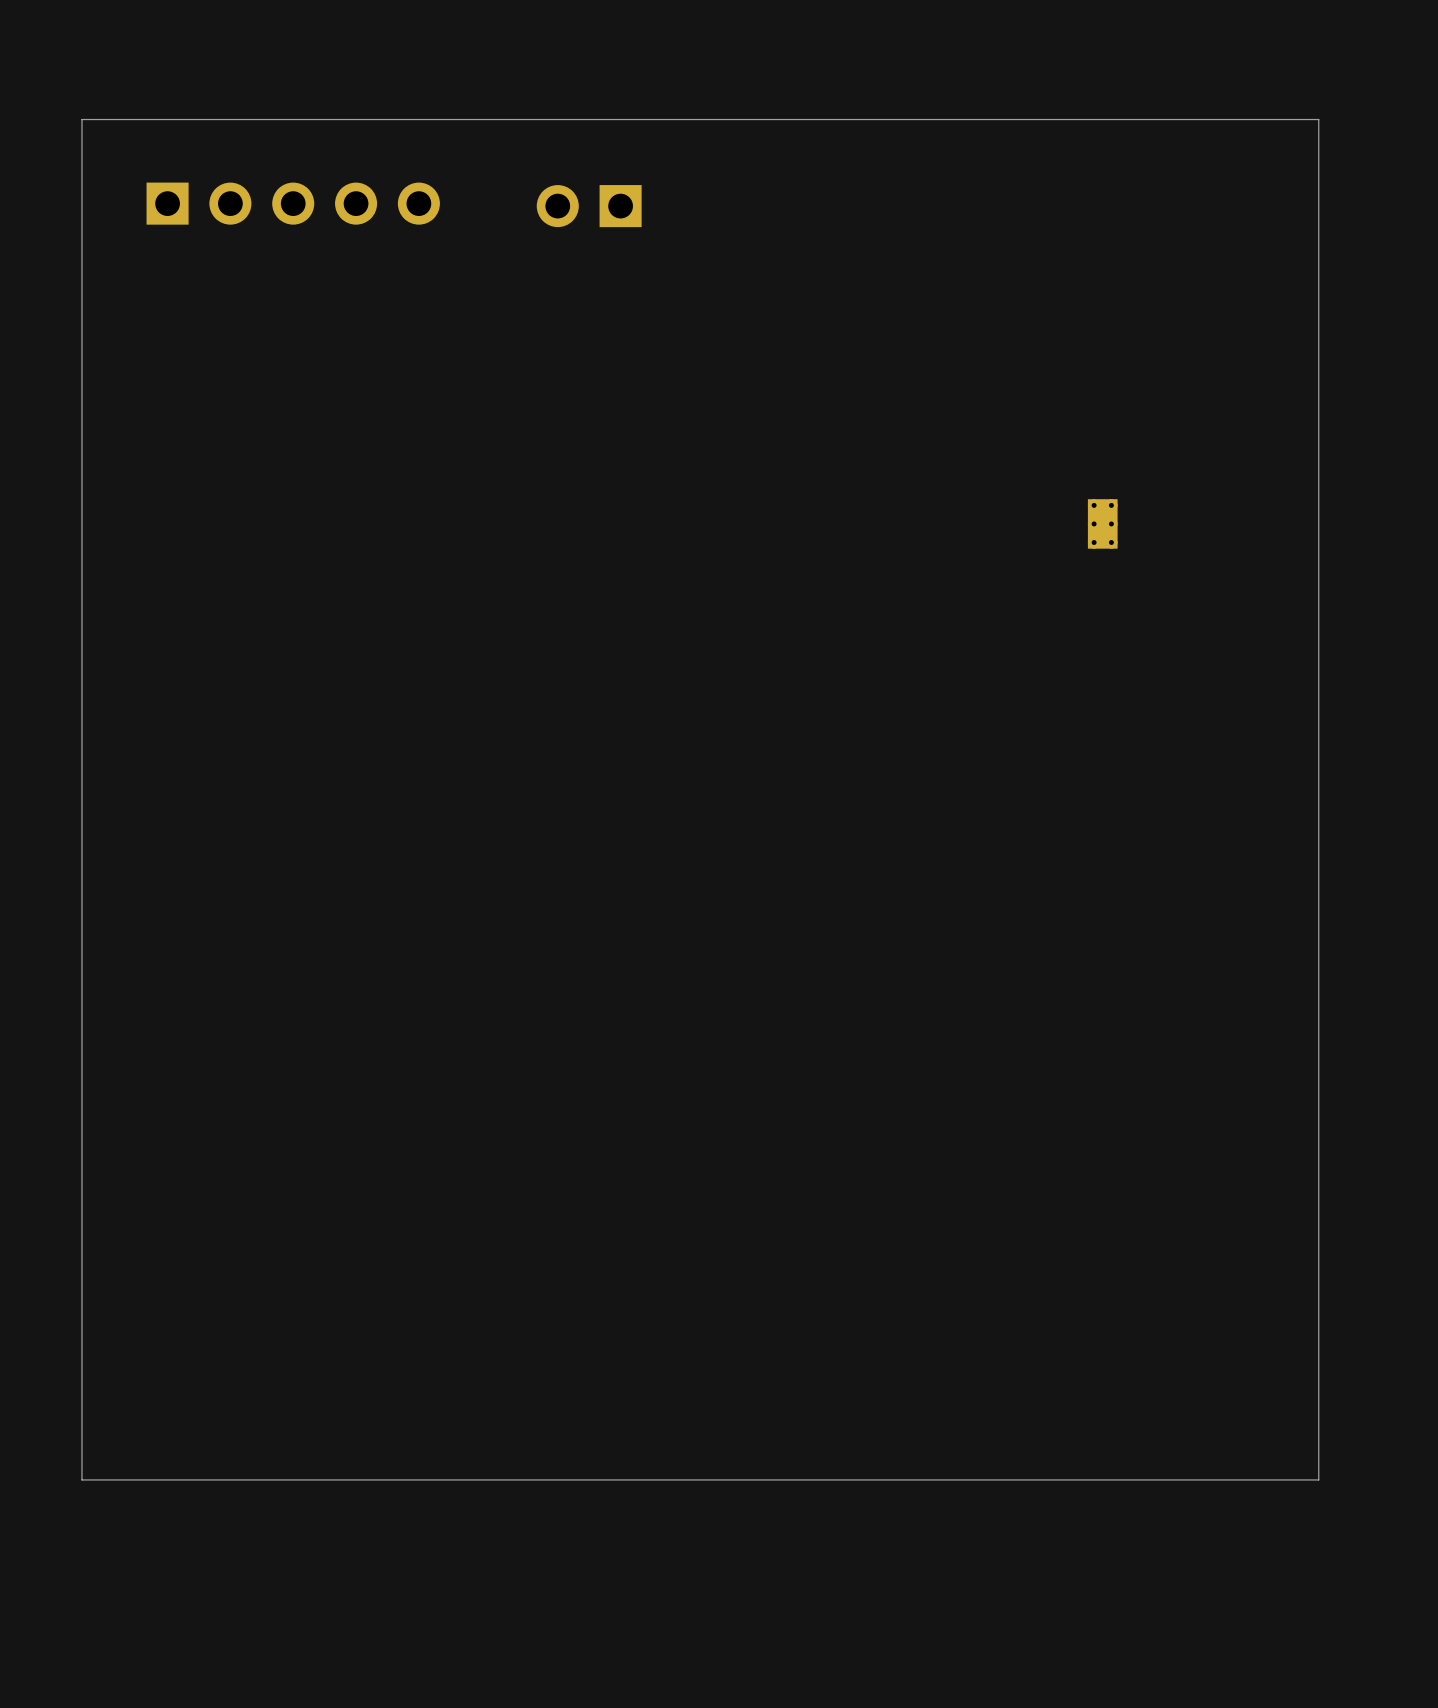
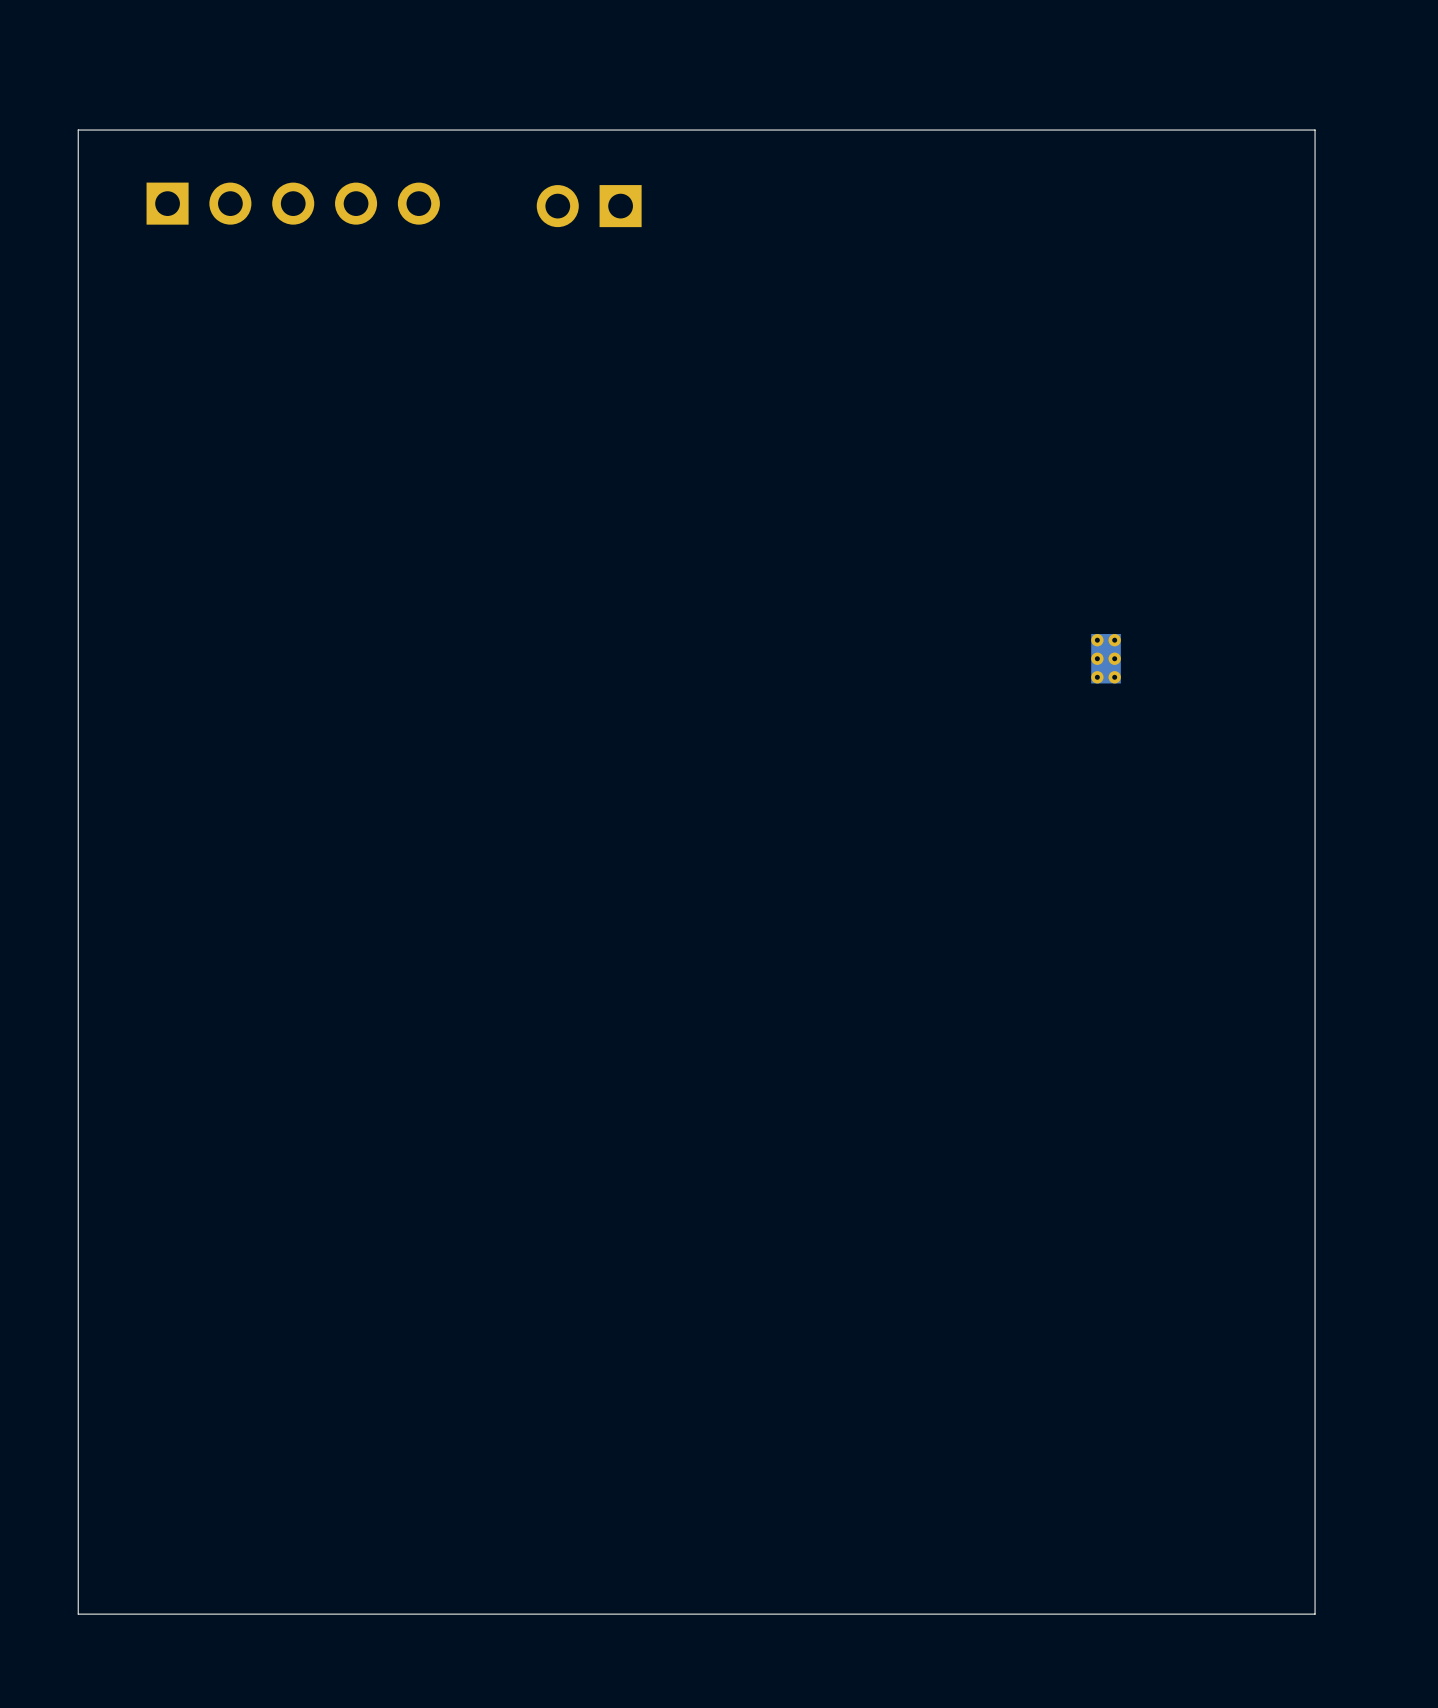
board edge: (1318, 119) (81, 119) (81, 1479) (1318, 1479) (1318, 119) -> (1315, 130) (1315, 1614) (78, 1614) (78, 130) (1315, 130)
part position: (1102, 523) -> (1106, 658)

